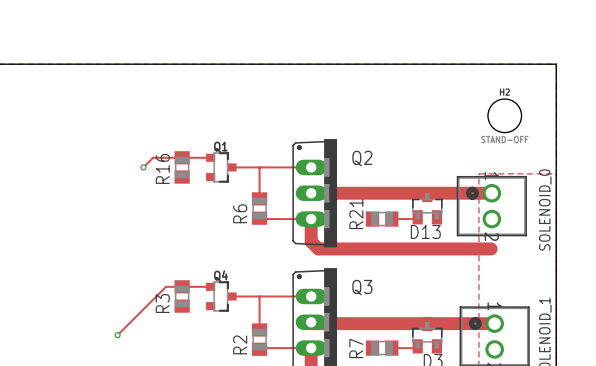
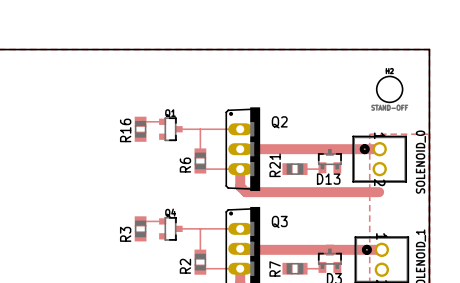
track: (182, 157) (153, 157) (143, 167) -> none
via: (143, 167) -> none
track: (182, 286) (165, 286) (117, 335) -> none
via: (117, 335) -> none

